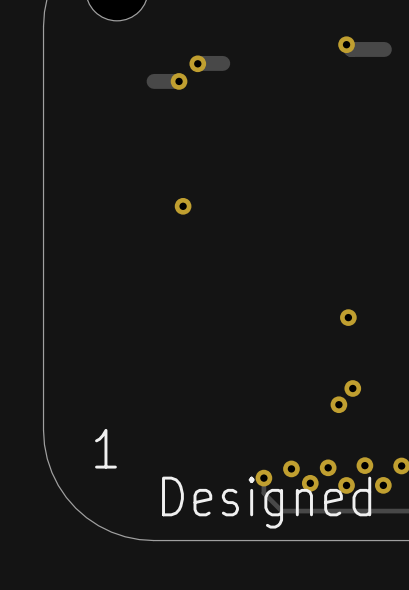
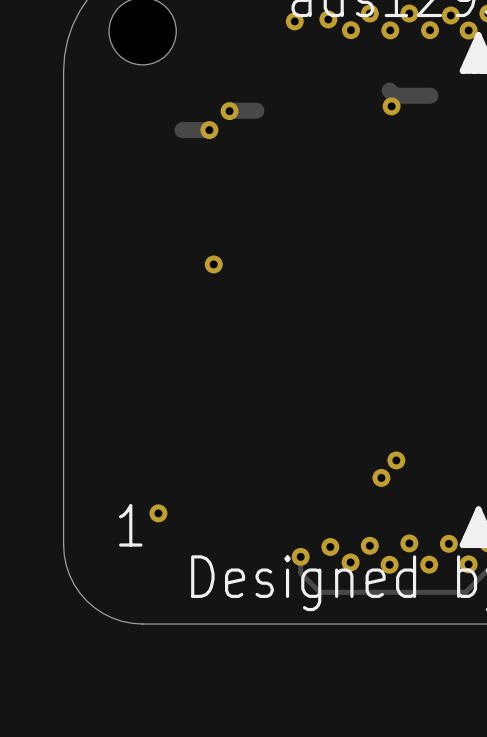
via position: (346, 44) -> (391, 106)
via: (348, 317) -> none
board edge: (43, 430) (47, 458) (51, 472) (66, 497) (75, 508) (86, 517) (111, 532) (125, 536) (153, 540) -> (63, 505) (63, 545) (66, 565) (74, 584) (86, 600) (103, 613) (122, 621) (142, 624) (182, 624)
via: none -> (158, 513)

